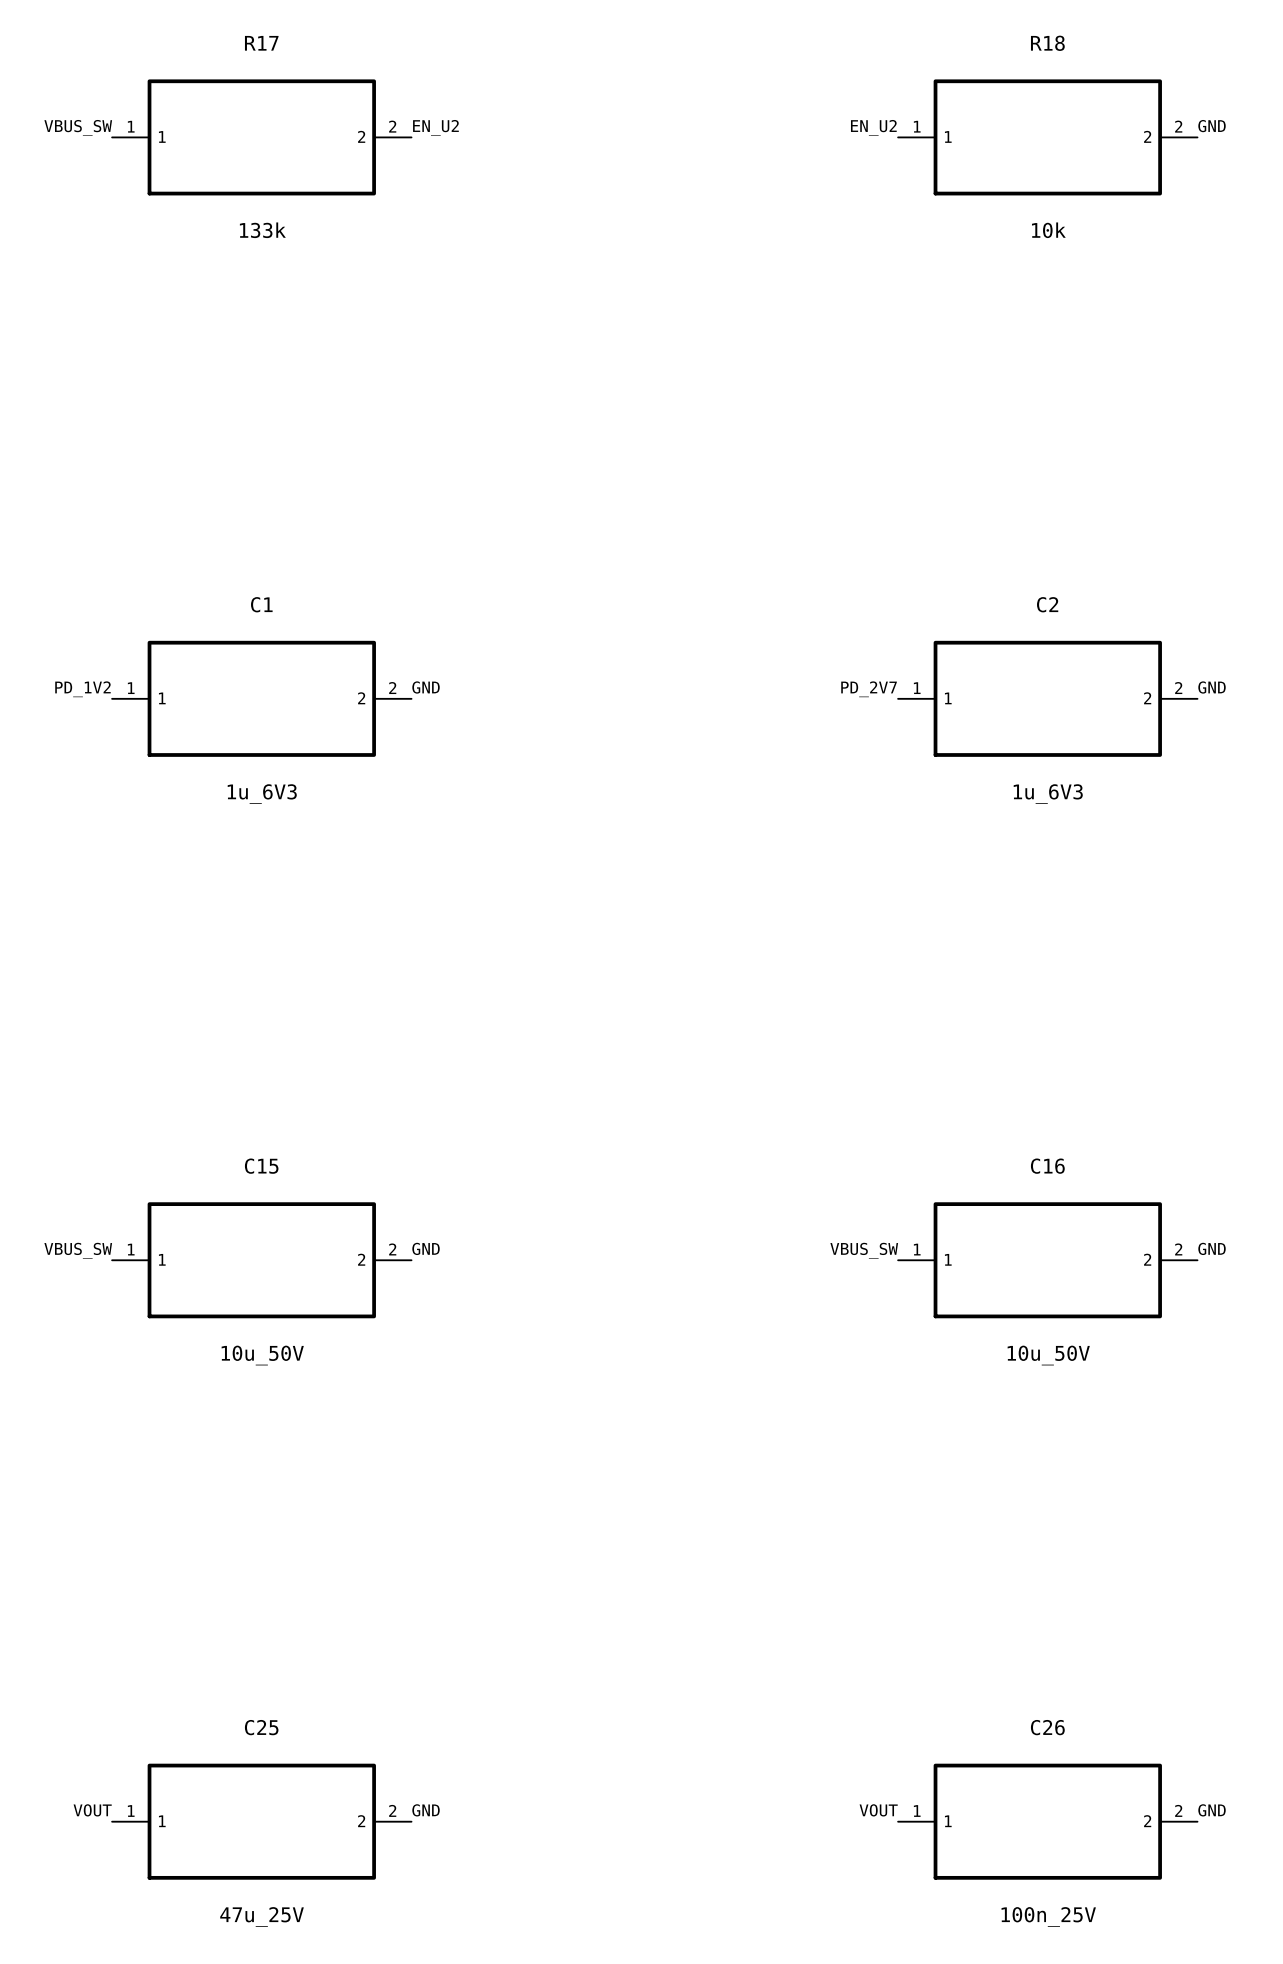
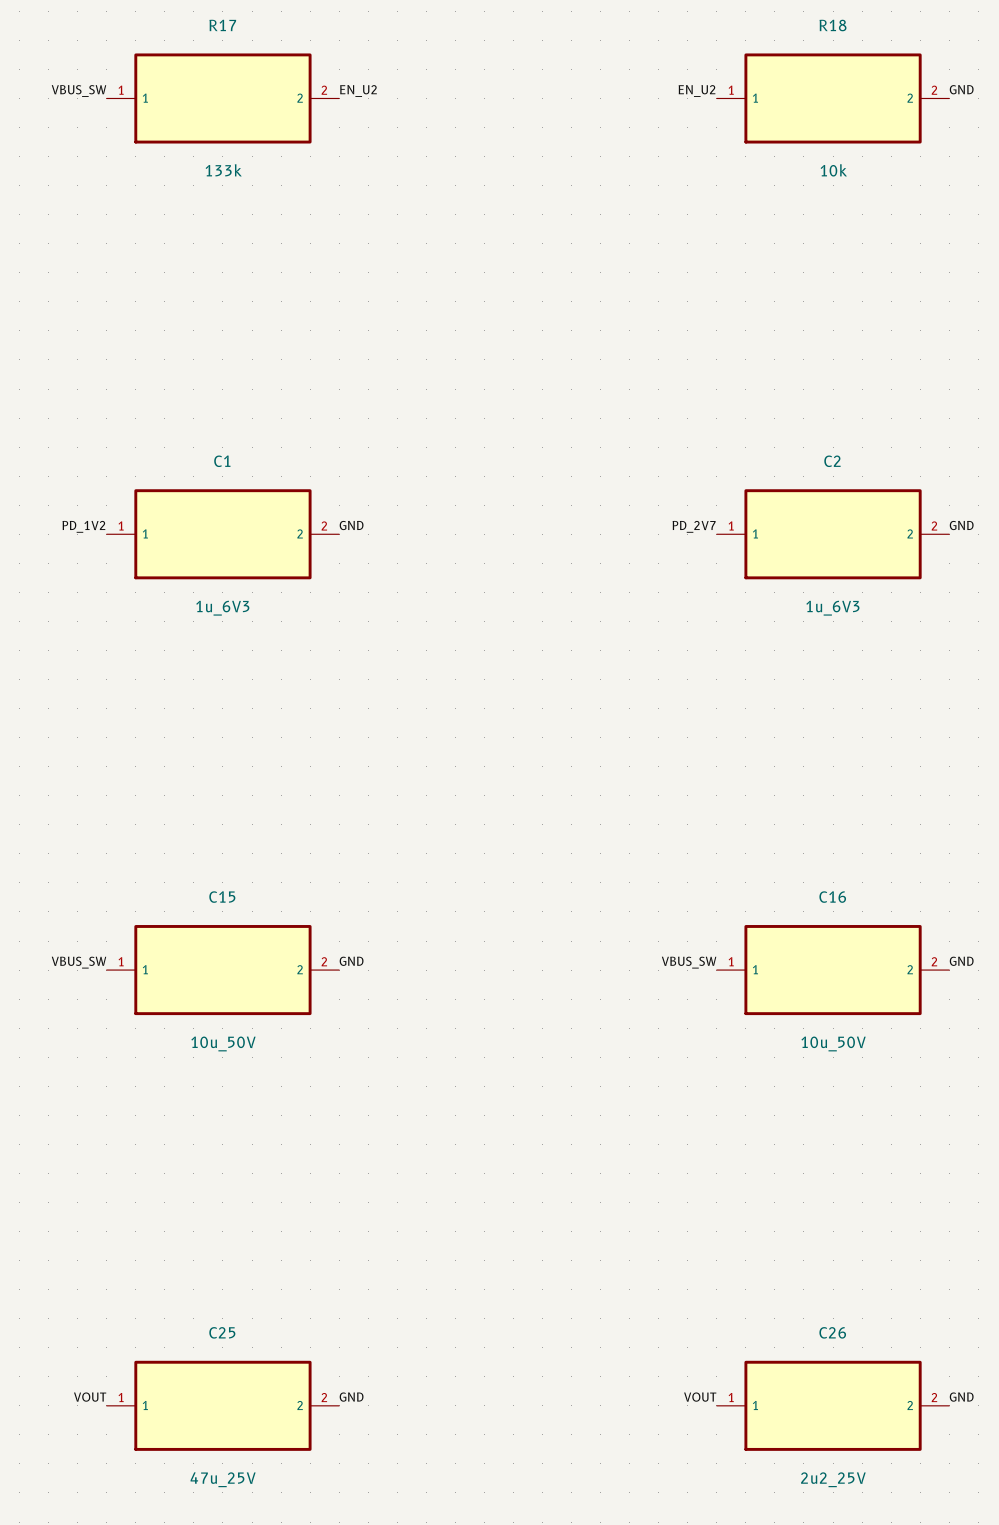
C26 value: 100n_25V (1048, 1916) -> 2u2_25V (833, 1479)

